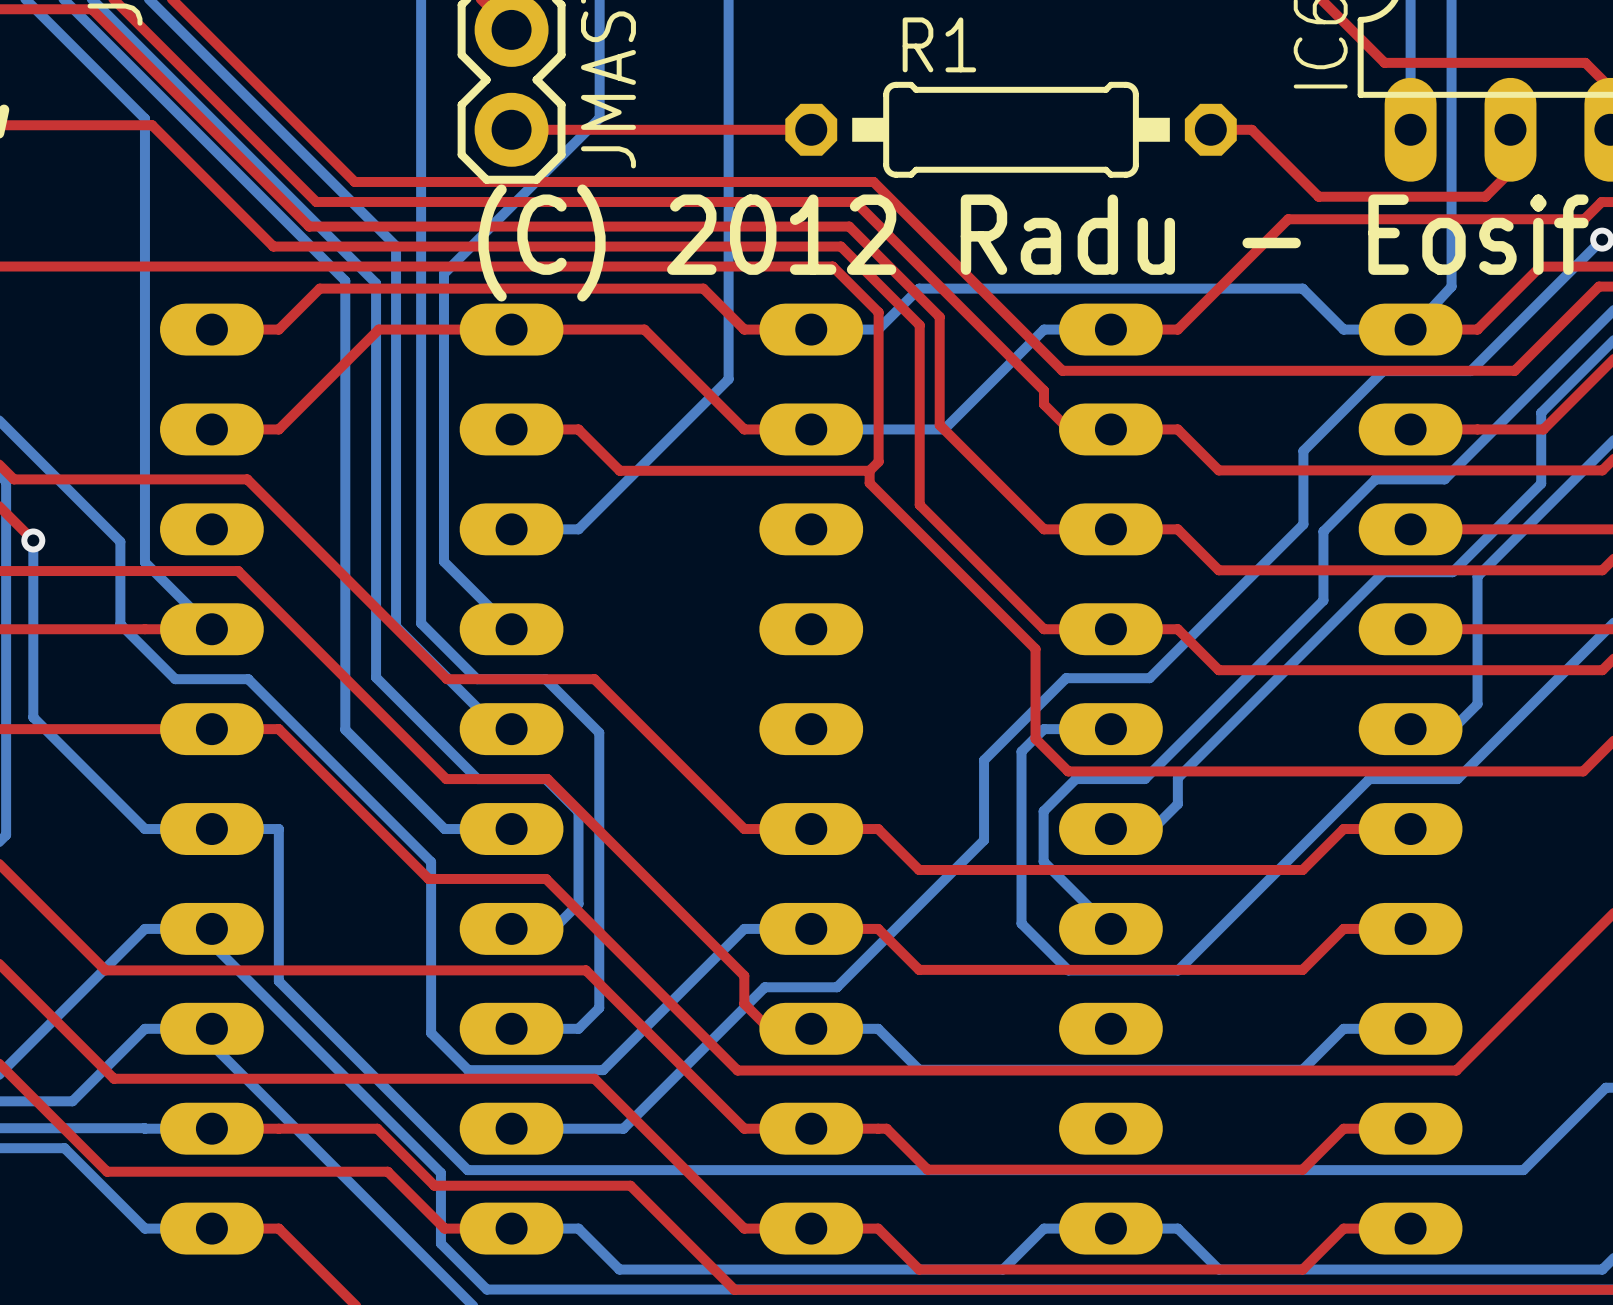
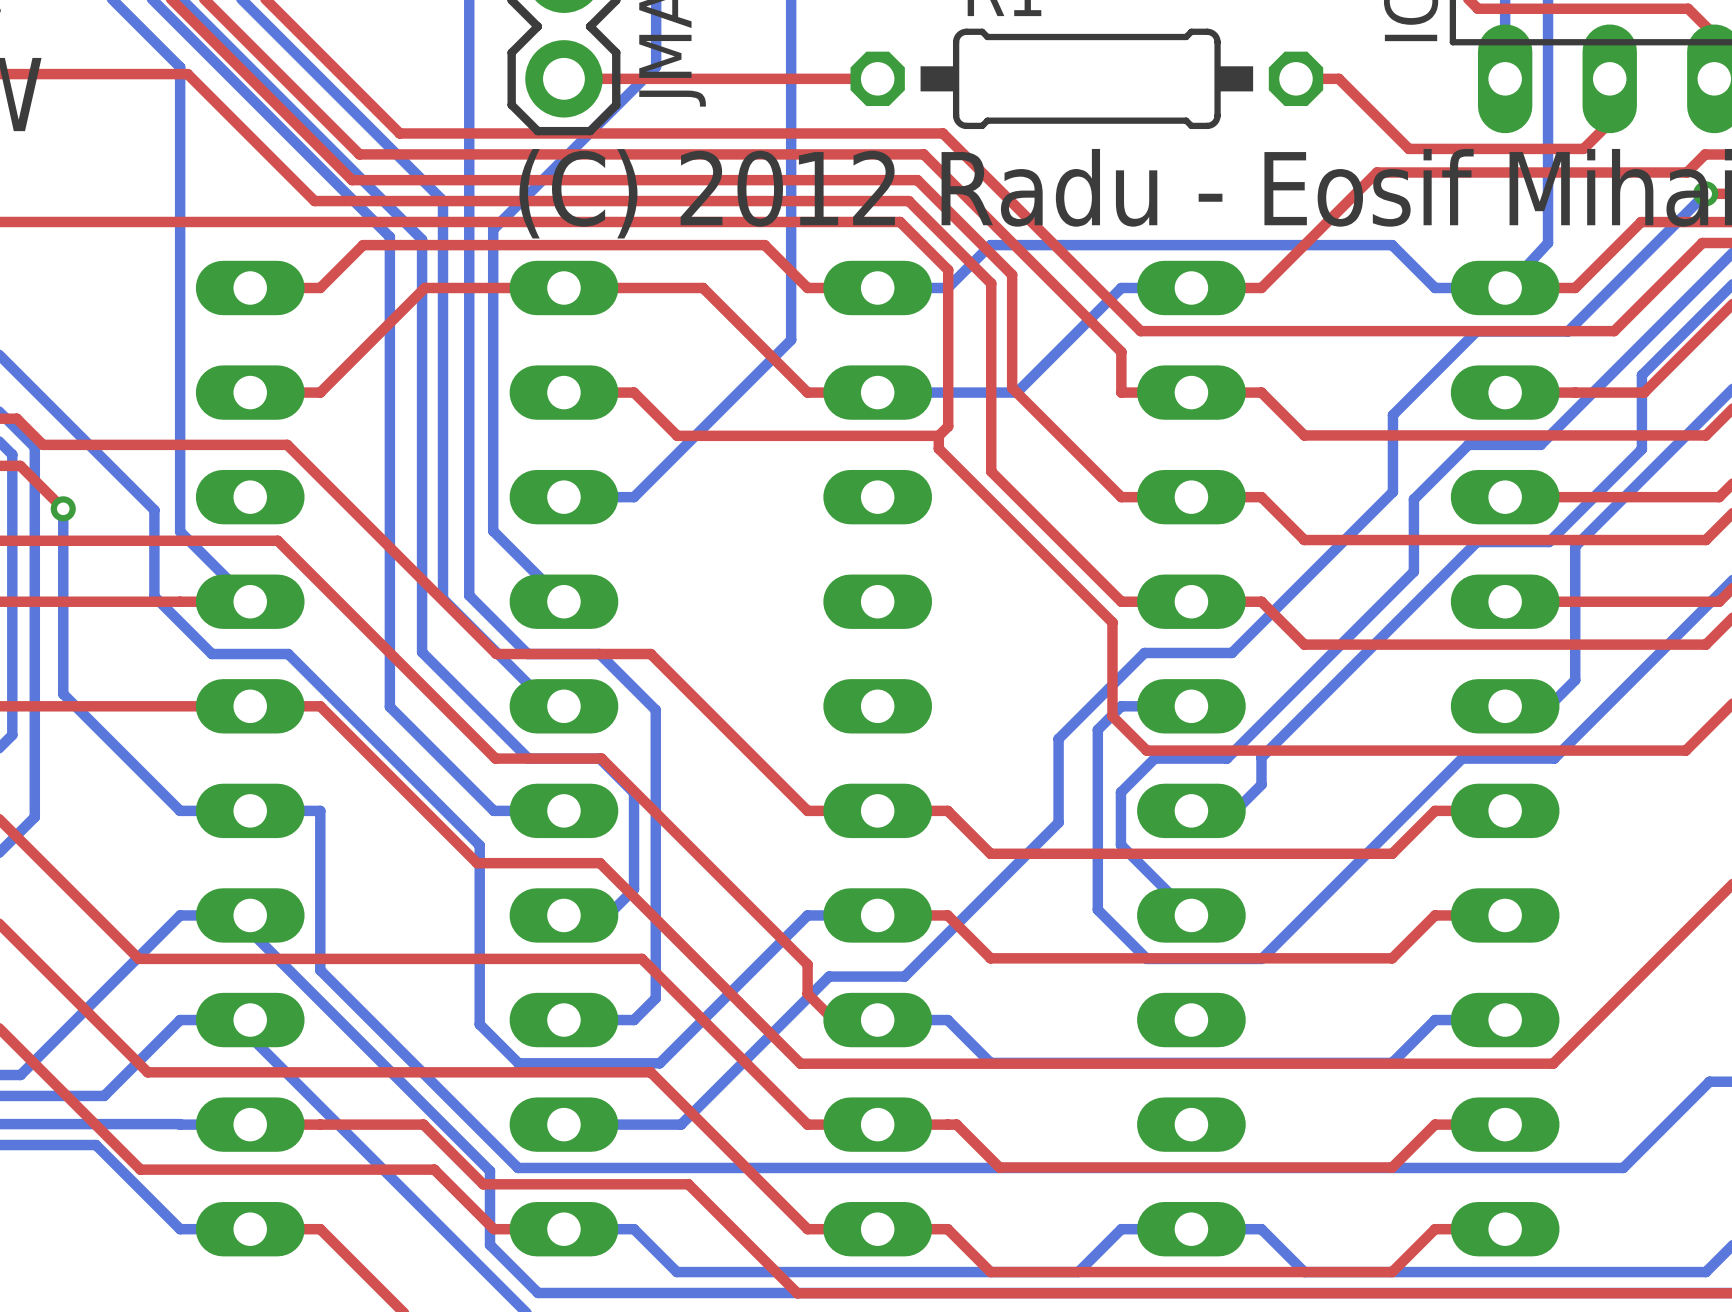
top track: (1043, 404) (1068, 429) -> (1121, 366) (1121, 392) (1147, 392)

